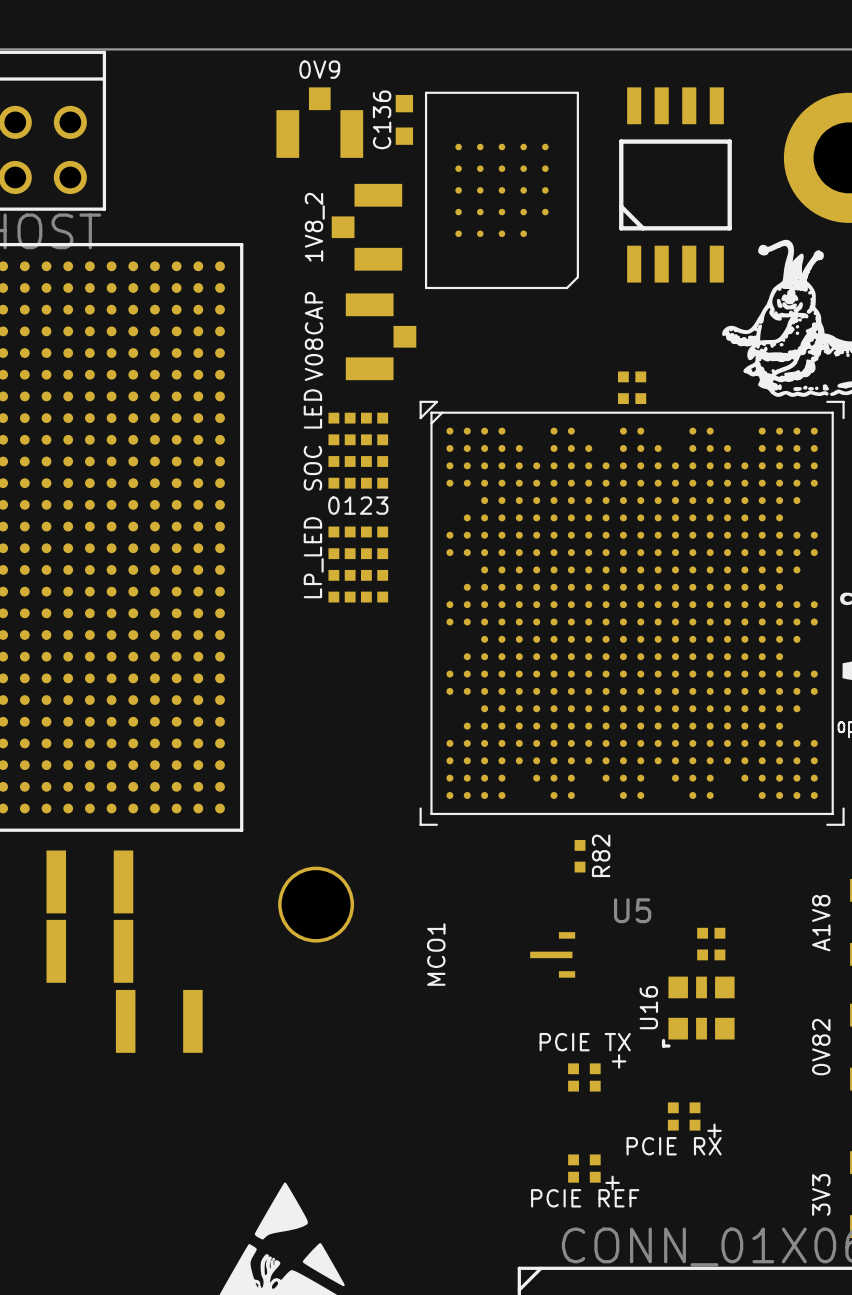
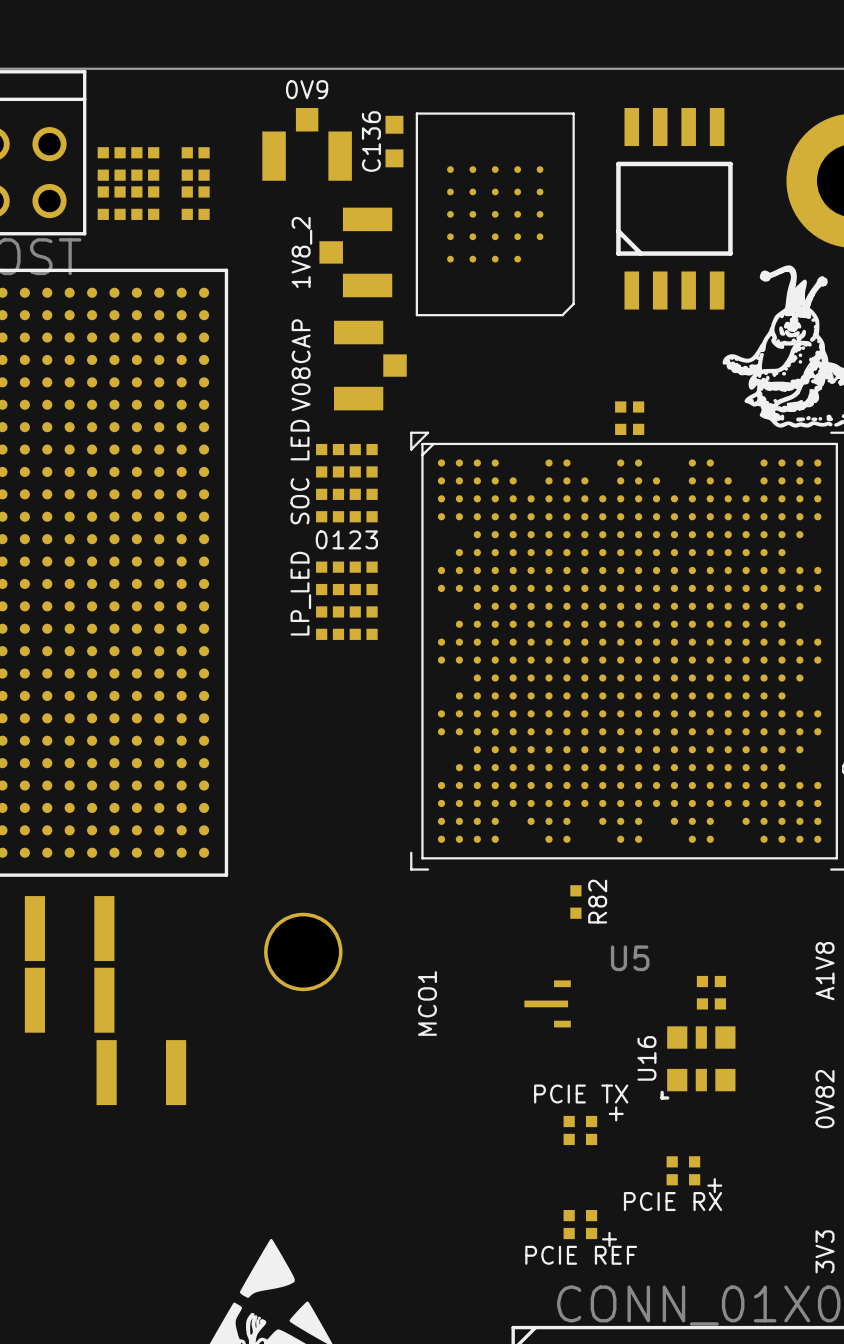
part: none -> (103, 163)
part: none -> (120, 163)
part: none -> (136, 163)
part: none -> (153, 163)
part: none -> (187, 163)
part: none -> (204, 163)
part: none -> (103, 203)
part: none -> (120, 203)
part: none -> (136, 203)
part: none -> (153, 203)
part: none -> (187, 203)
part: none -> (204, 203)

